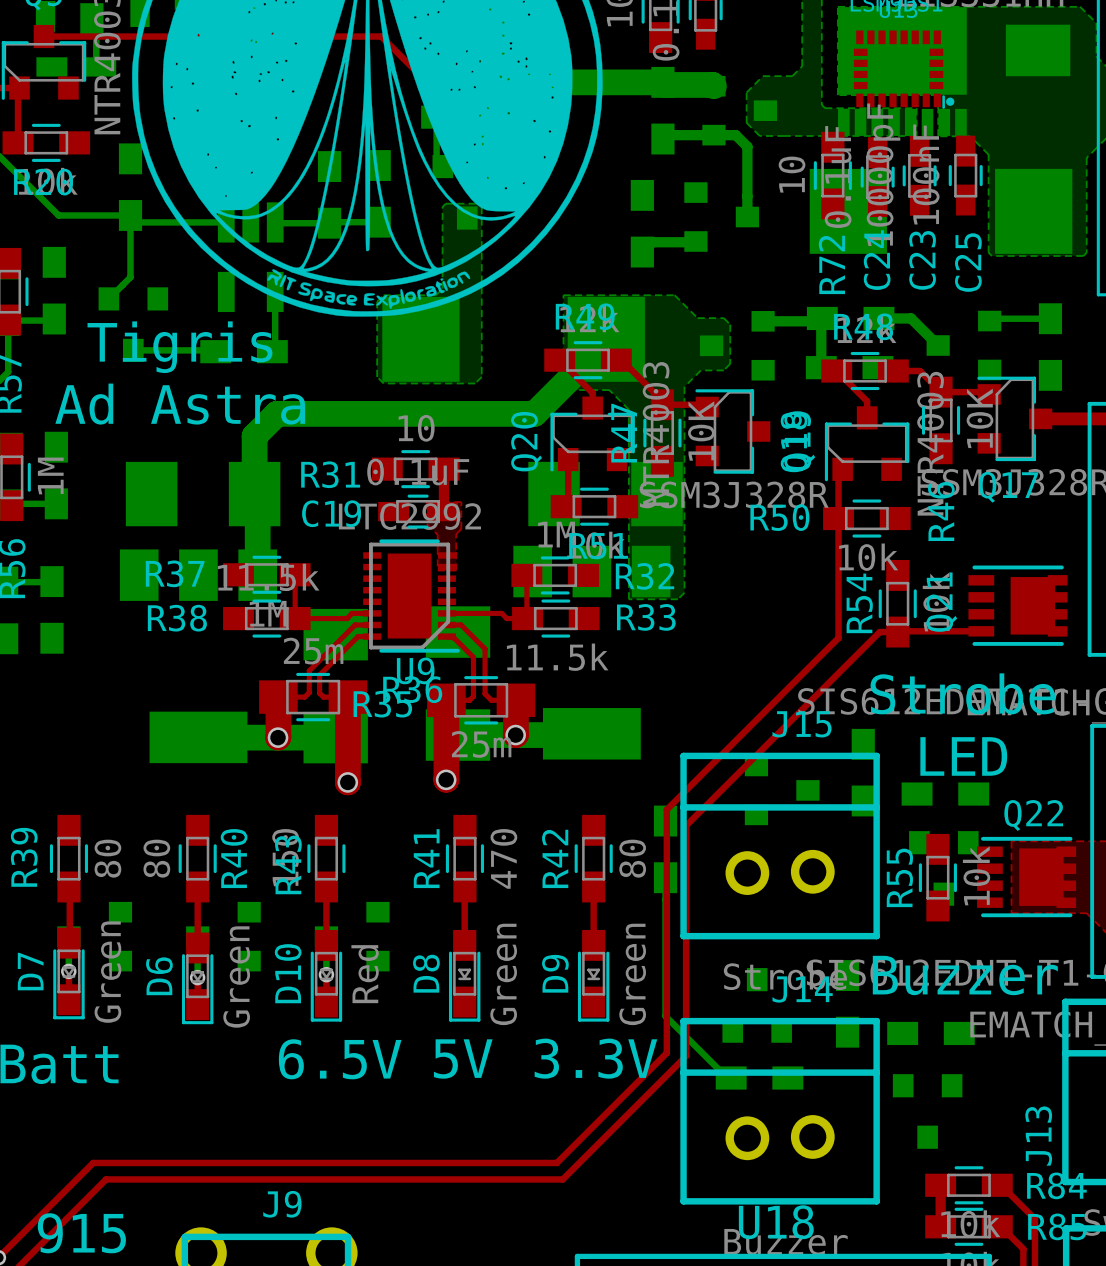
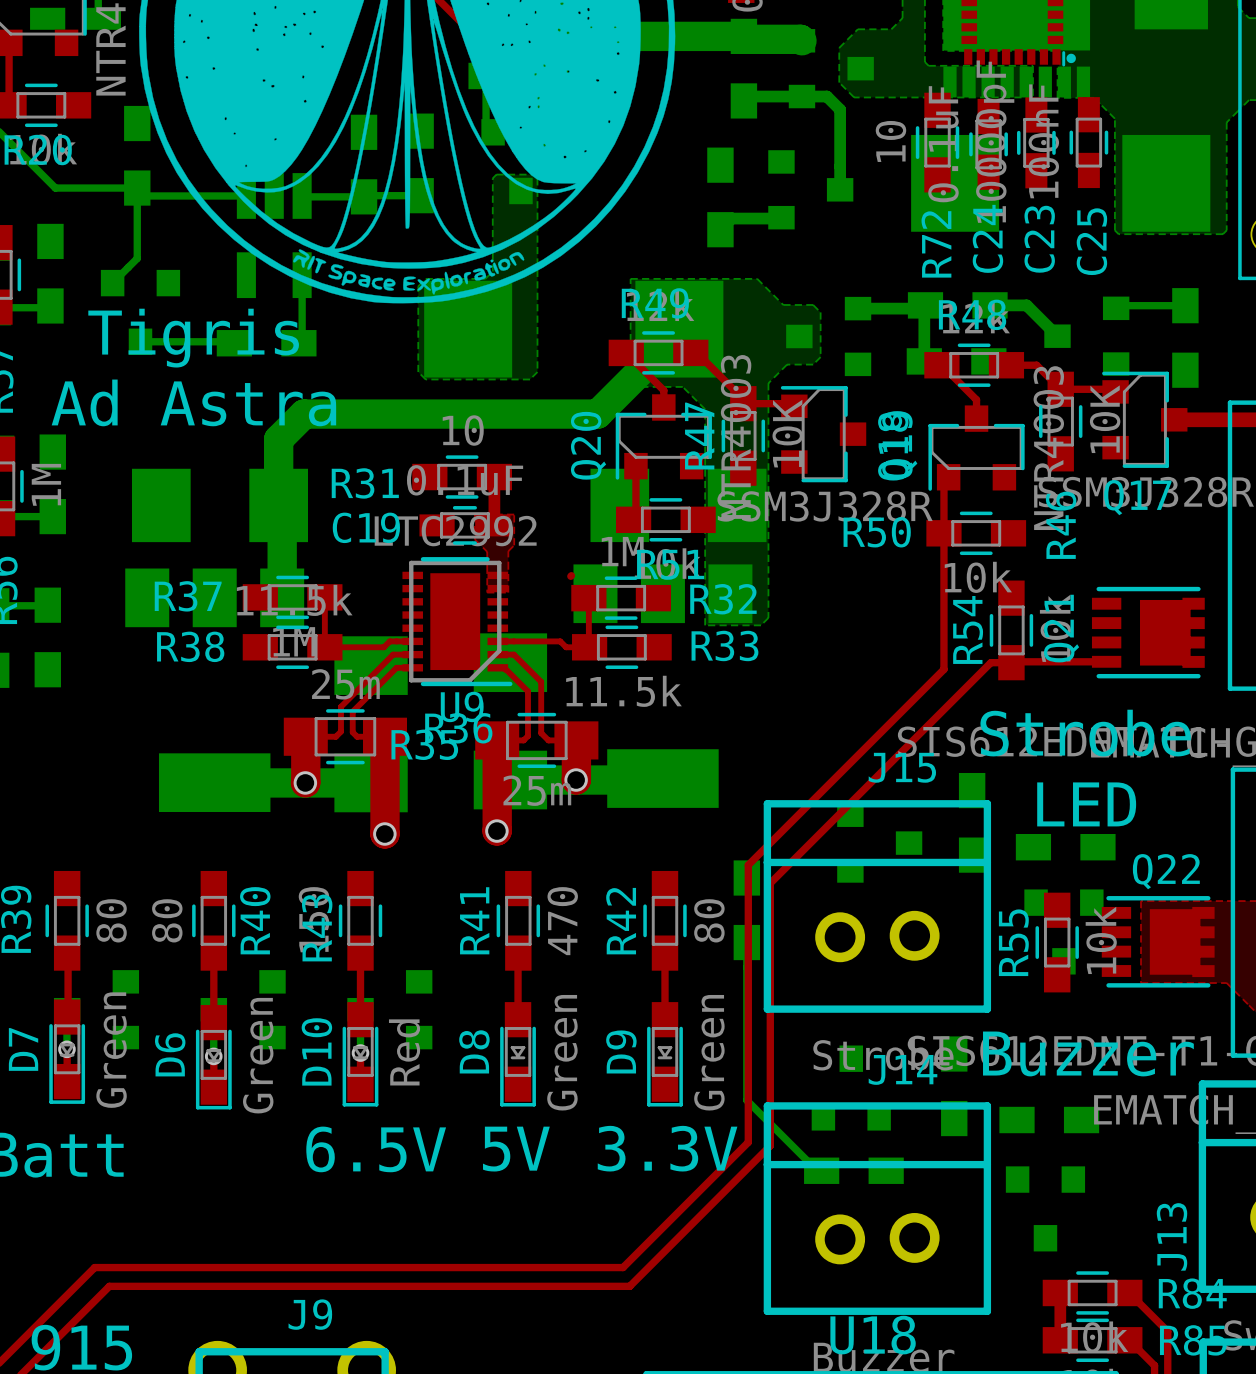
top track: none -> (571, 575) (570, 576)

